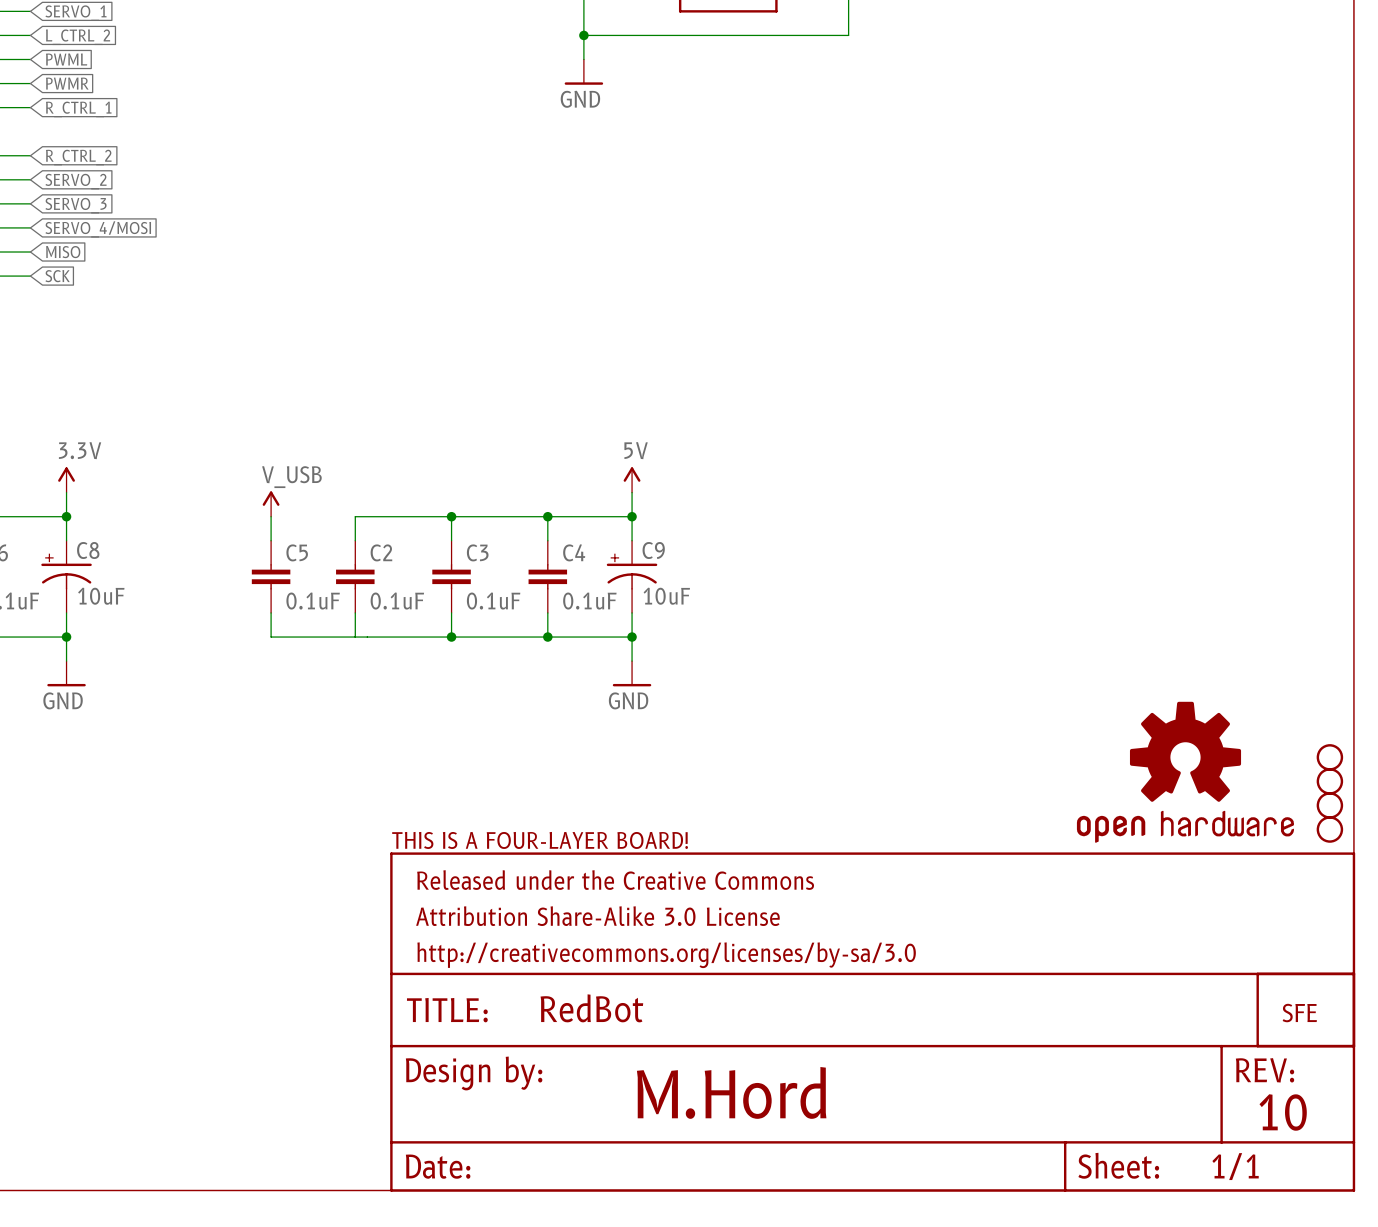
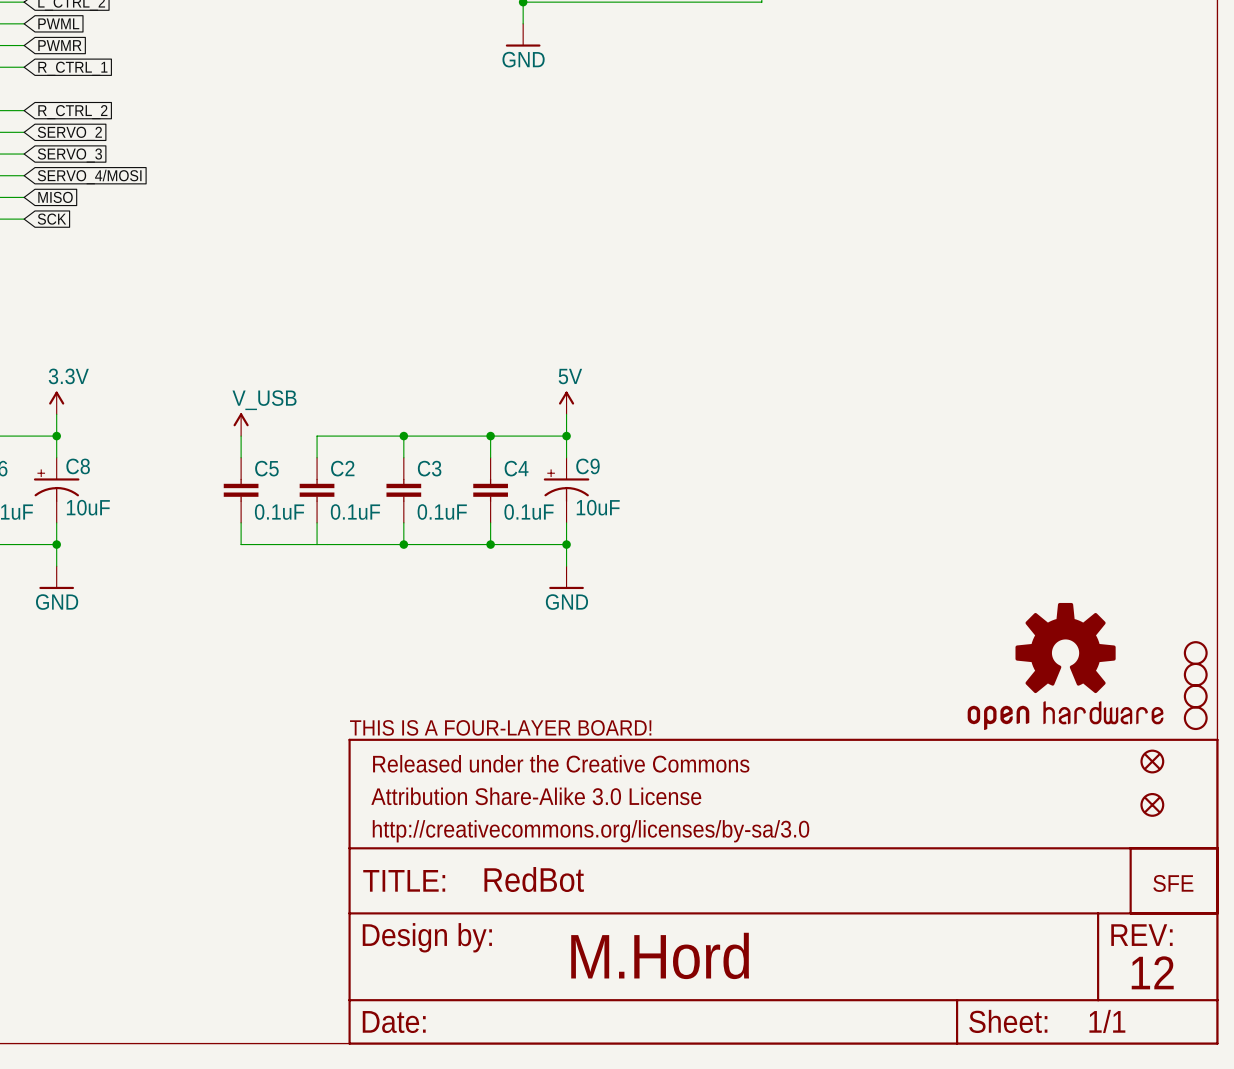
part: none -> (1152, 761)
part: none -> (1152, 804)
text: 10 (1283, 1112) -> 12 (1152, 972)

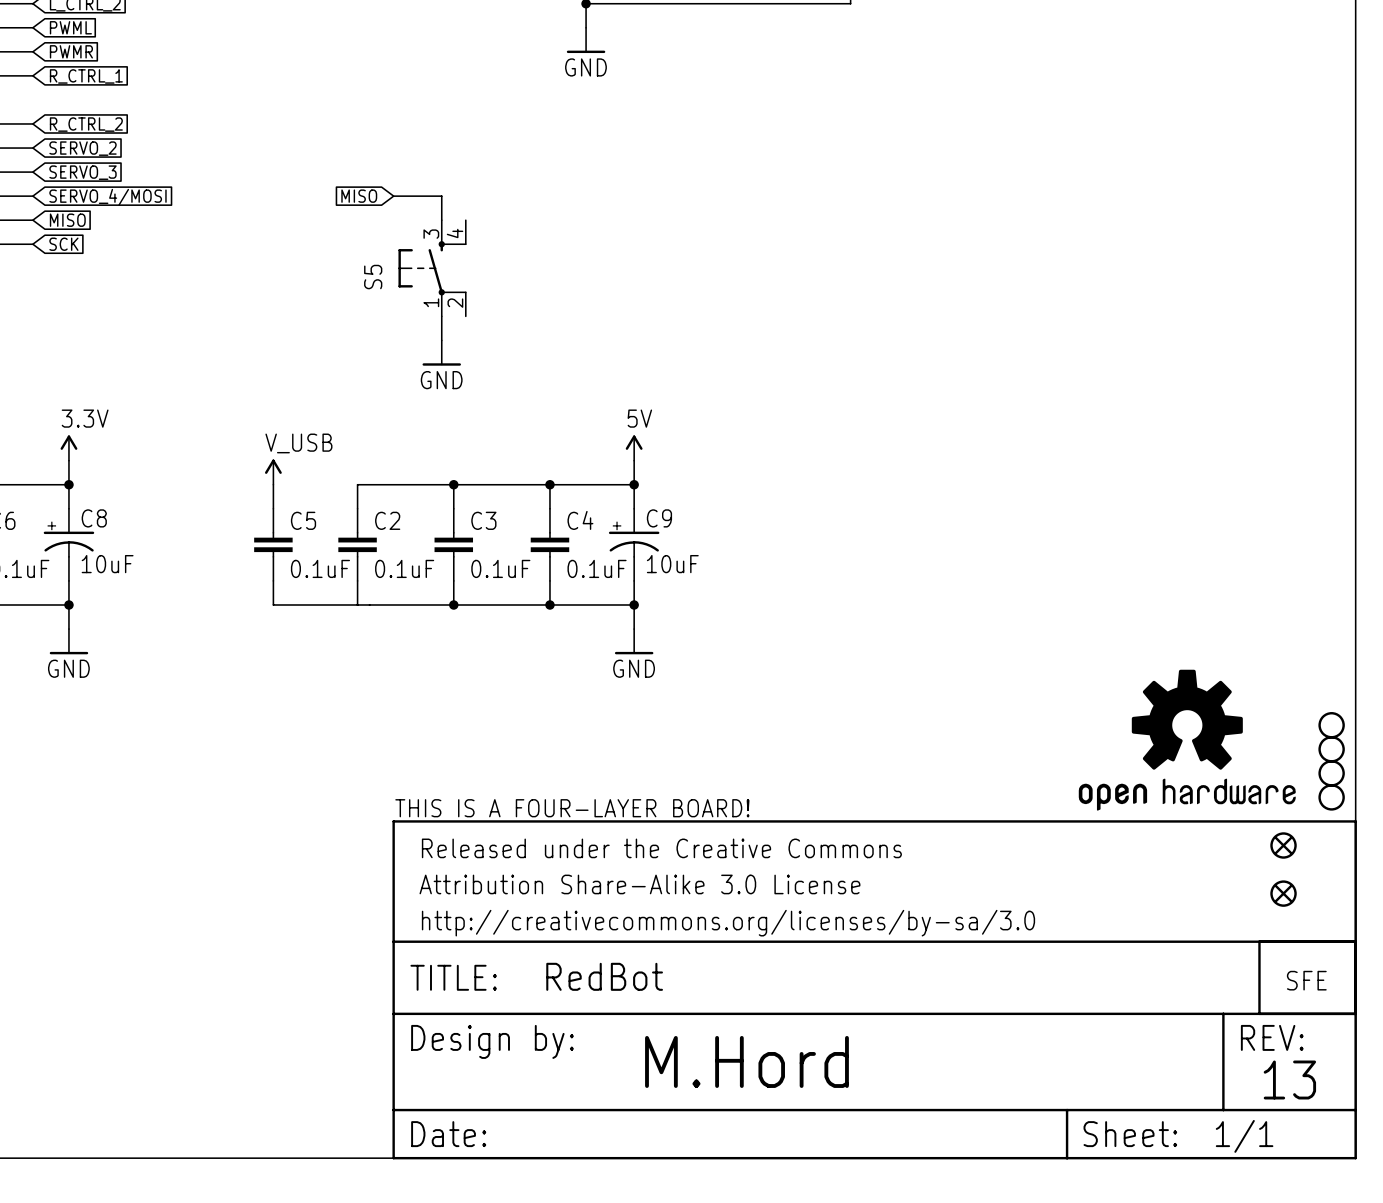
global label: none -> MISO (359, 196)
wire: none -> (393, 196) (441, 196) (441, 220)
S5: none -> (432, 268)
wire: none -> (441, 316) (441, 340)
power symbol: none -> GND (441, 353)
text: 12 (1152, 972) -> 13 (1289, 1079)

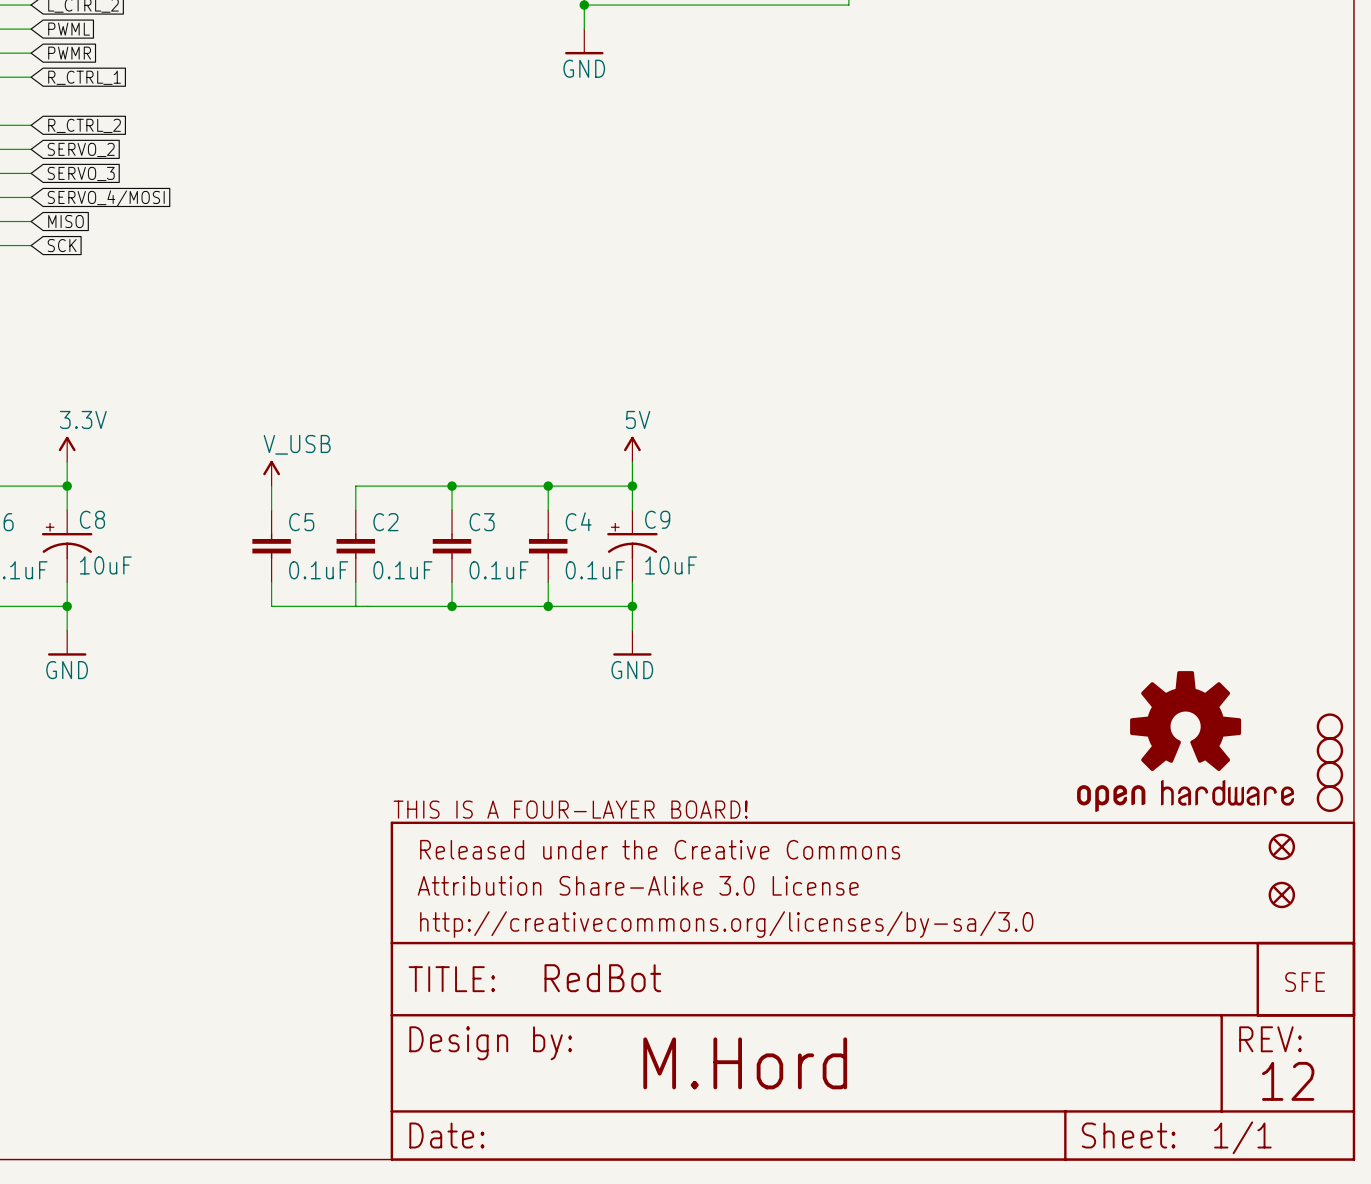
global label: MISO (359, 196) -> none
wire: (393, 196) (441, 196) (441, 220) -> none
S5: (432, 268) -> none
wire: (441, 316) (441, 340) -> none
power symbol: GND (441, 353) -> none
text: 13 (1289, 1079) -> 12 (1288, 1081)

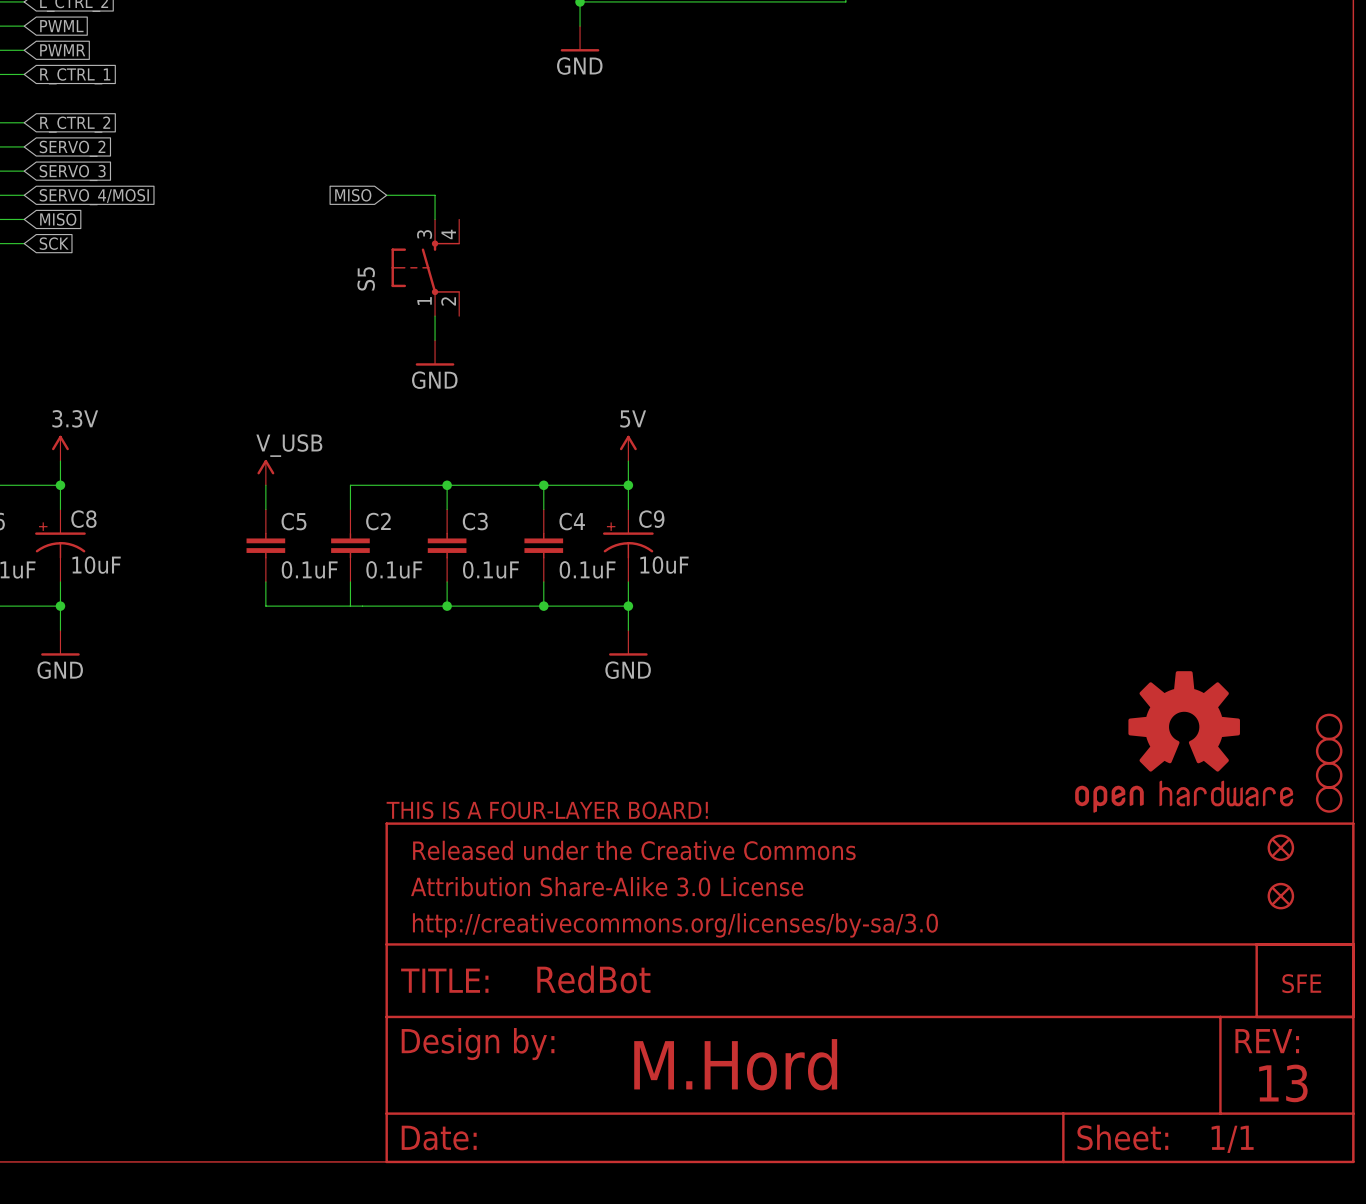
global label: none -> MISO (353, 195)
wire: none -> (386, 195) (435, 195) (435, 219)
S5: none -> (425, 267)
wire: none -> (435, 316) (435, 340)
power symbol: none -> GND (435, 352)
text: 12 (1288, 1081) -> 13 (1283, 1083)

